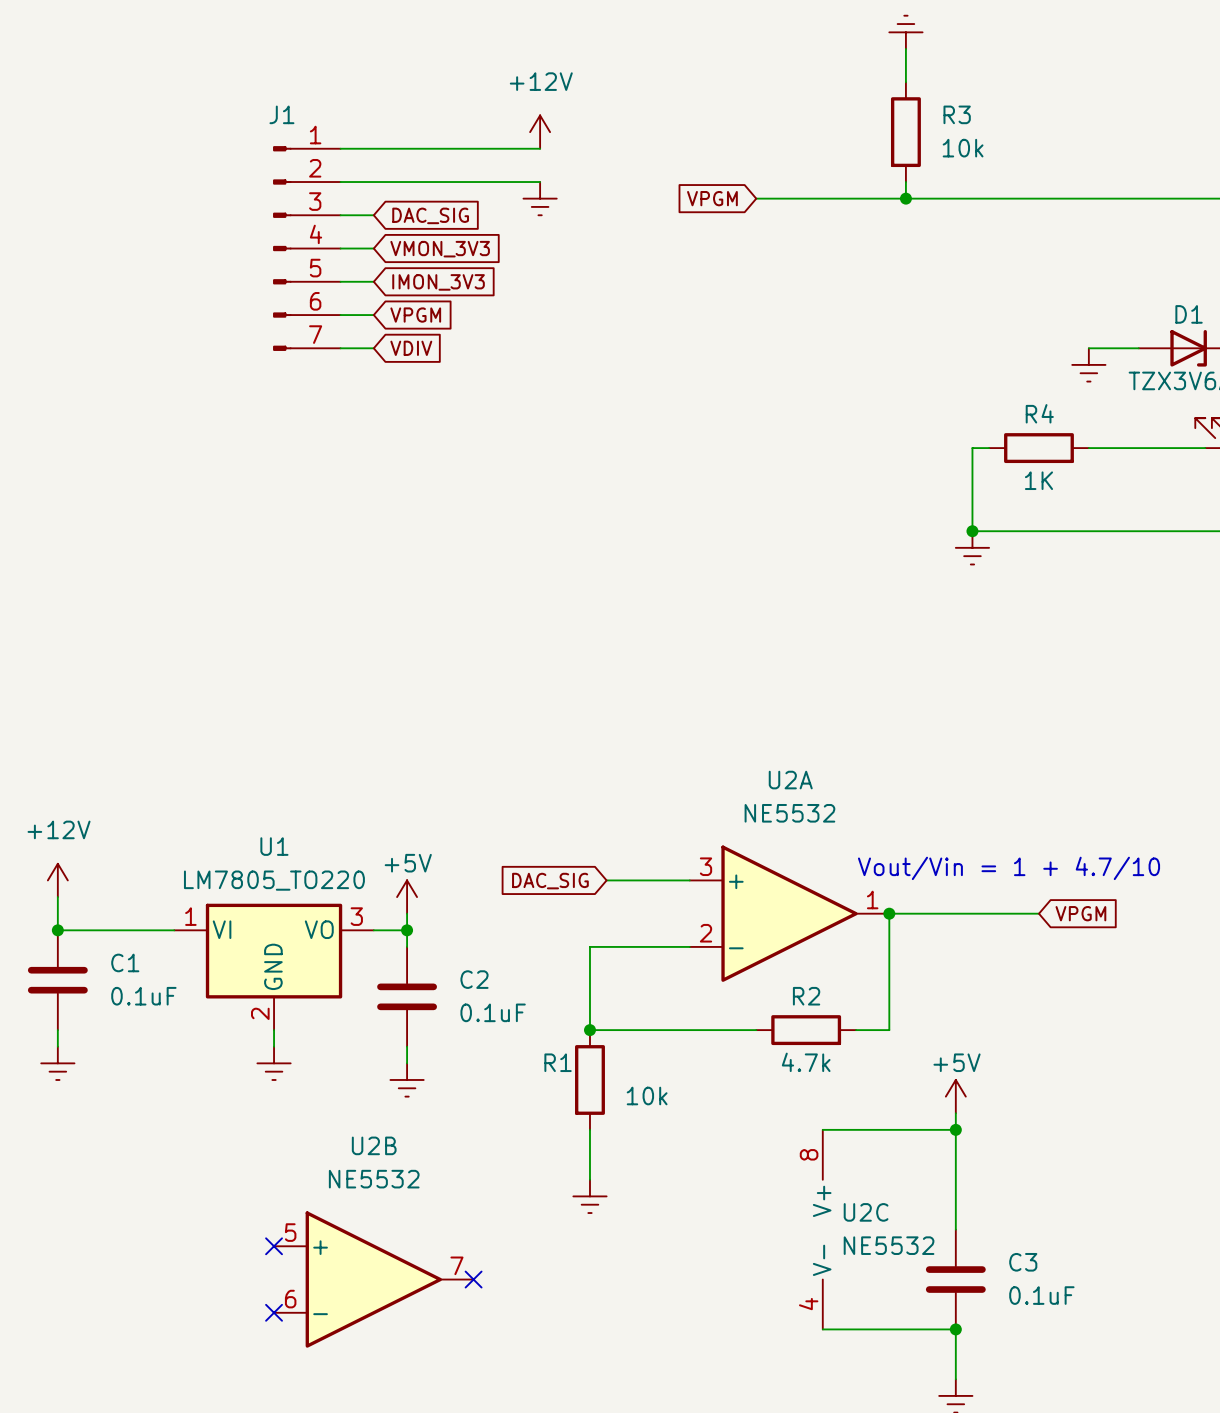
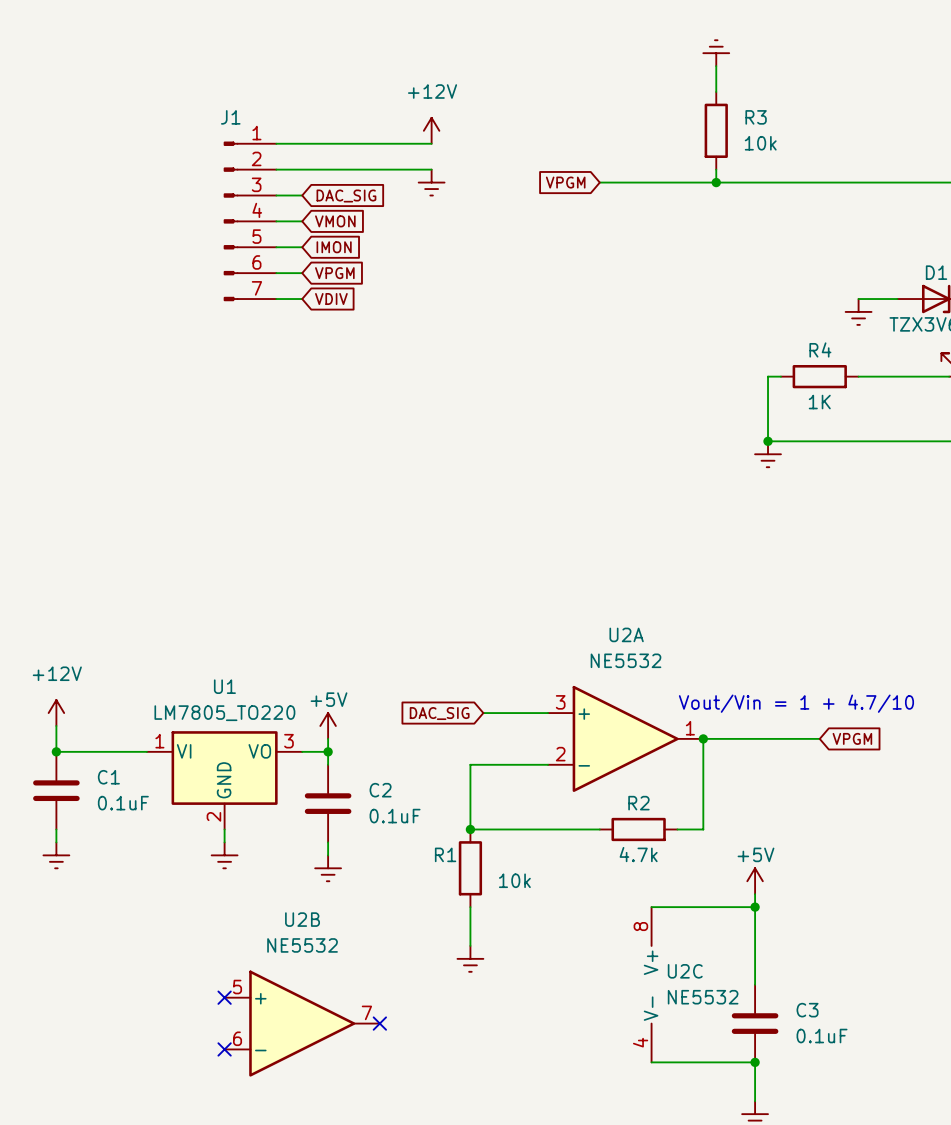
global label: VMON_3V3 (440, 249) -> VMON (335, 221)
global label: IMON_3V3 (438, 282) -> IMON (334, 247)

